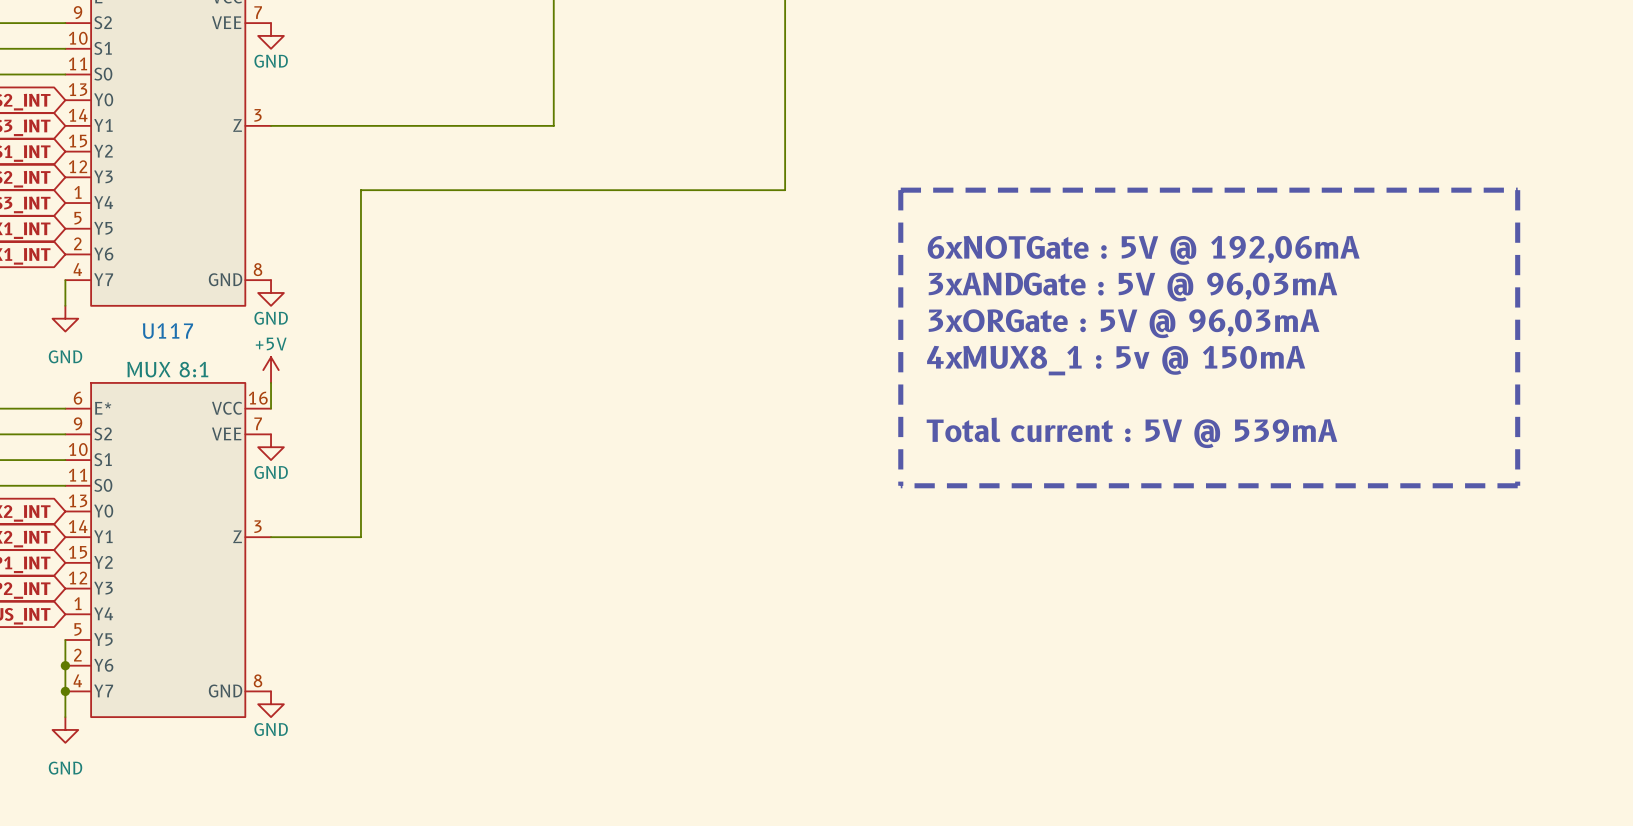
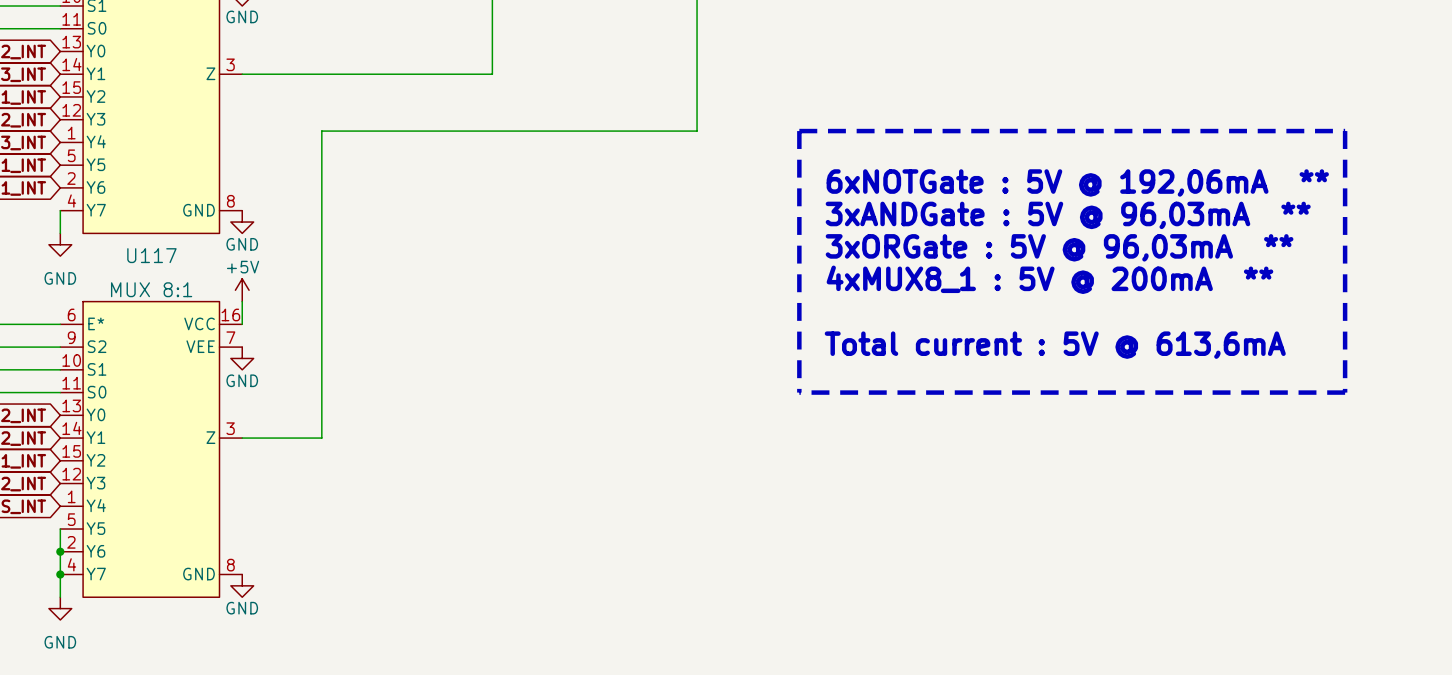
text: 6xNOTGate : 5V @ 192,06mA (1143, 250) -> 6xNOTGate : 5V @ 192,06mA ** (1077, 182)
text: 3xANDGate : 5V @ 96,03mA (1132, 286) -> 3xANDGate : 5V @ 96,03mA ** (1068, 215)
text: 3xORGate : 5V @ 96,03mA (1124, 323) -> 3xORGate : 5V @ 96,03mA ** (1059, 247)
text: 4xMUX8_1 : 5v @ 150mA (1116, 360) -> 4xMUX8_1 : 5V @ 200mA ** (1049, 279)
text: Total current : 5V @ 539mA (1131, 432) -> Total current : 5V @ 613,6mA (1055, 345)

